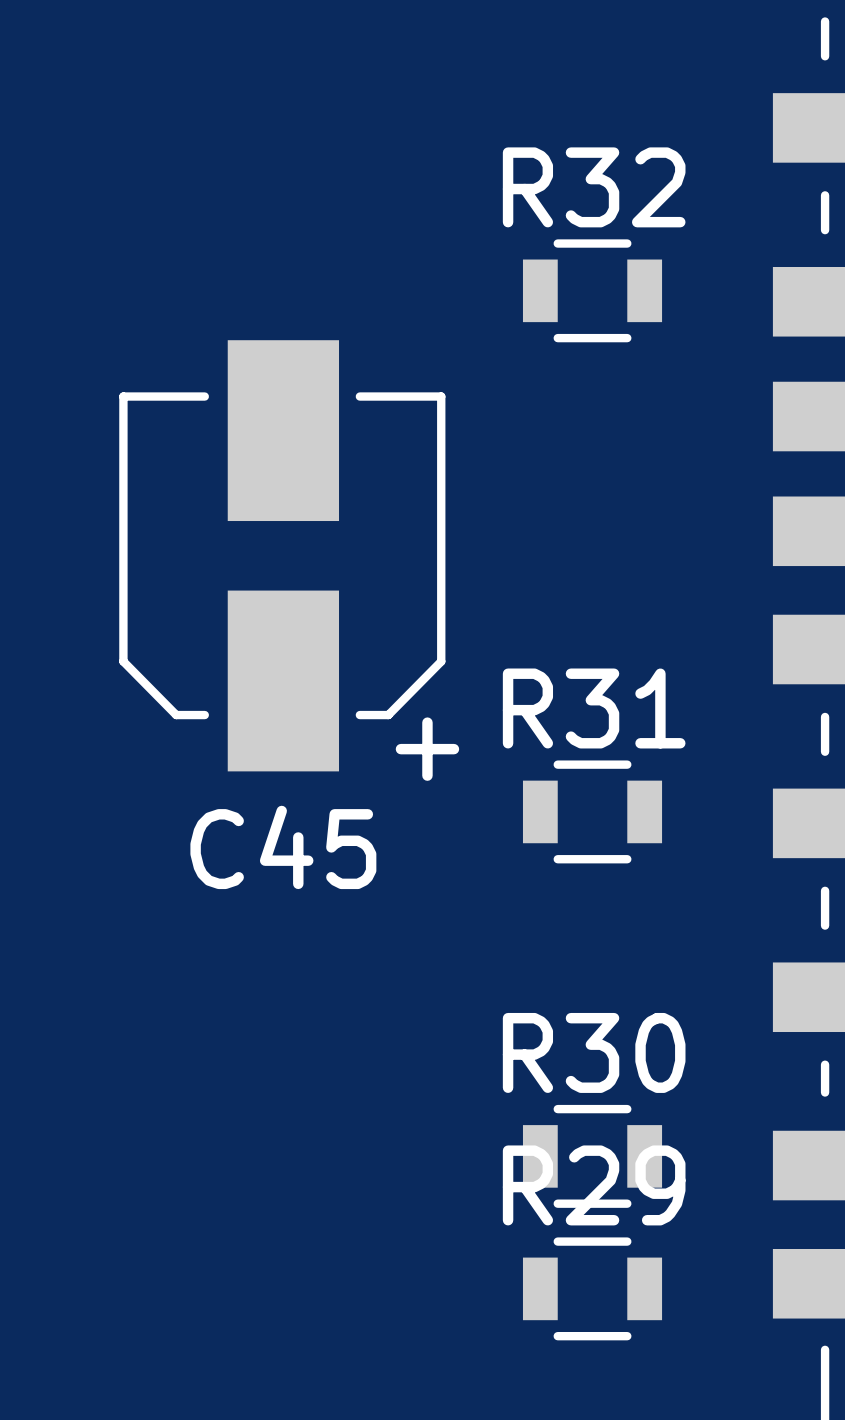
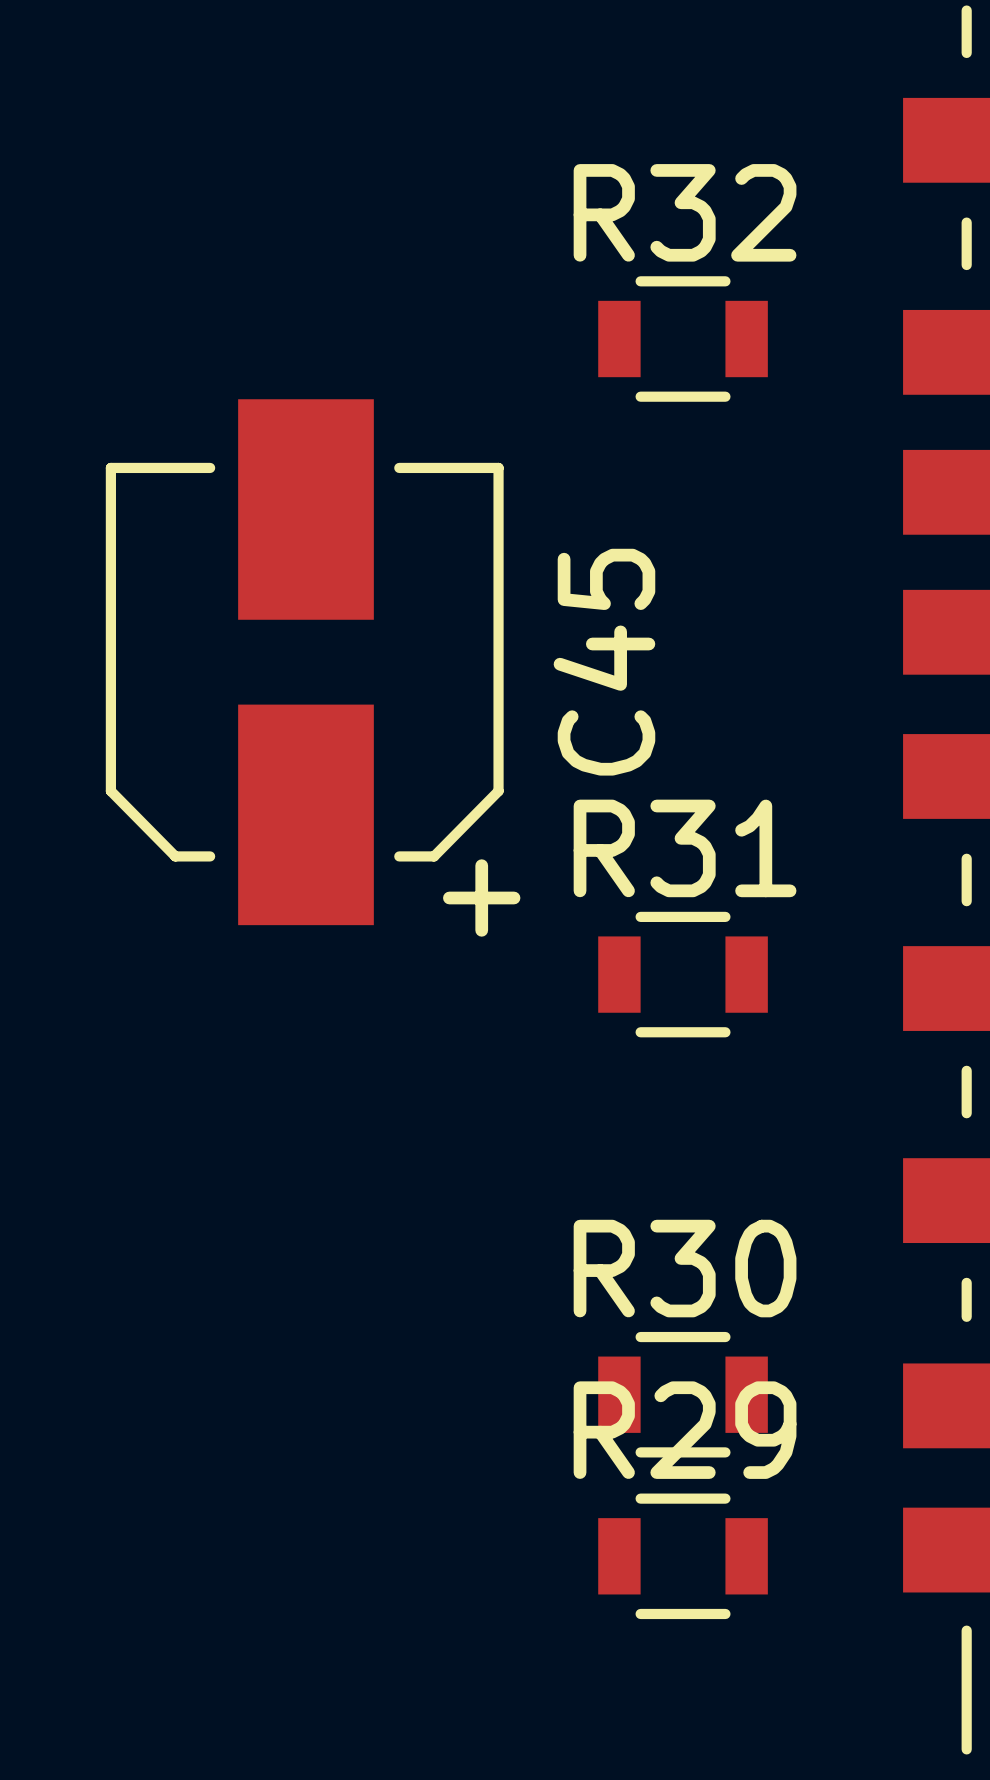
C45 name rotation: 0° (283, 847) -> 90° counterclockwise (604, 662)
C45 name position: C45 (283, 847) -> C45 (604, 662)

